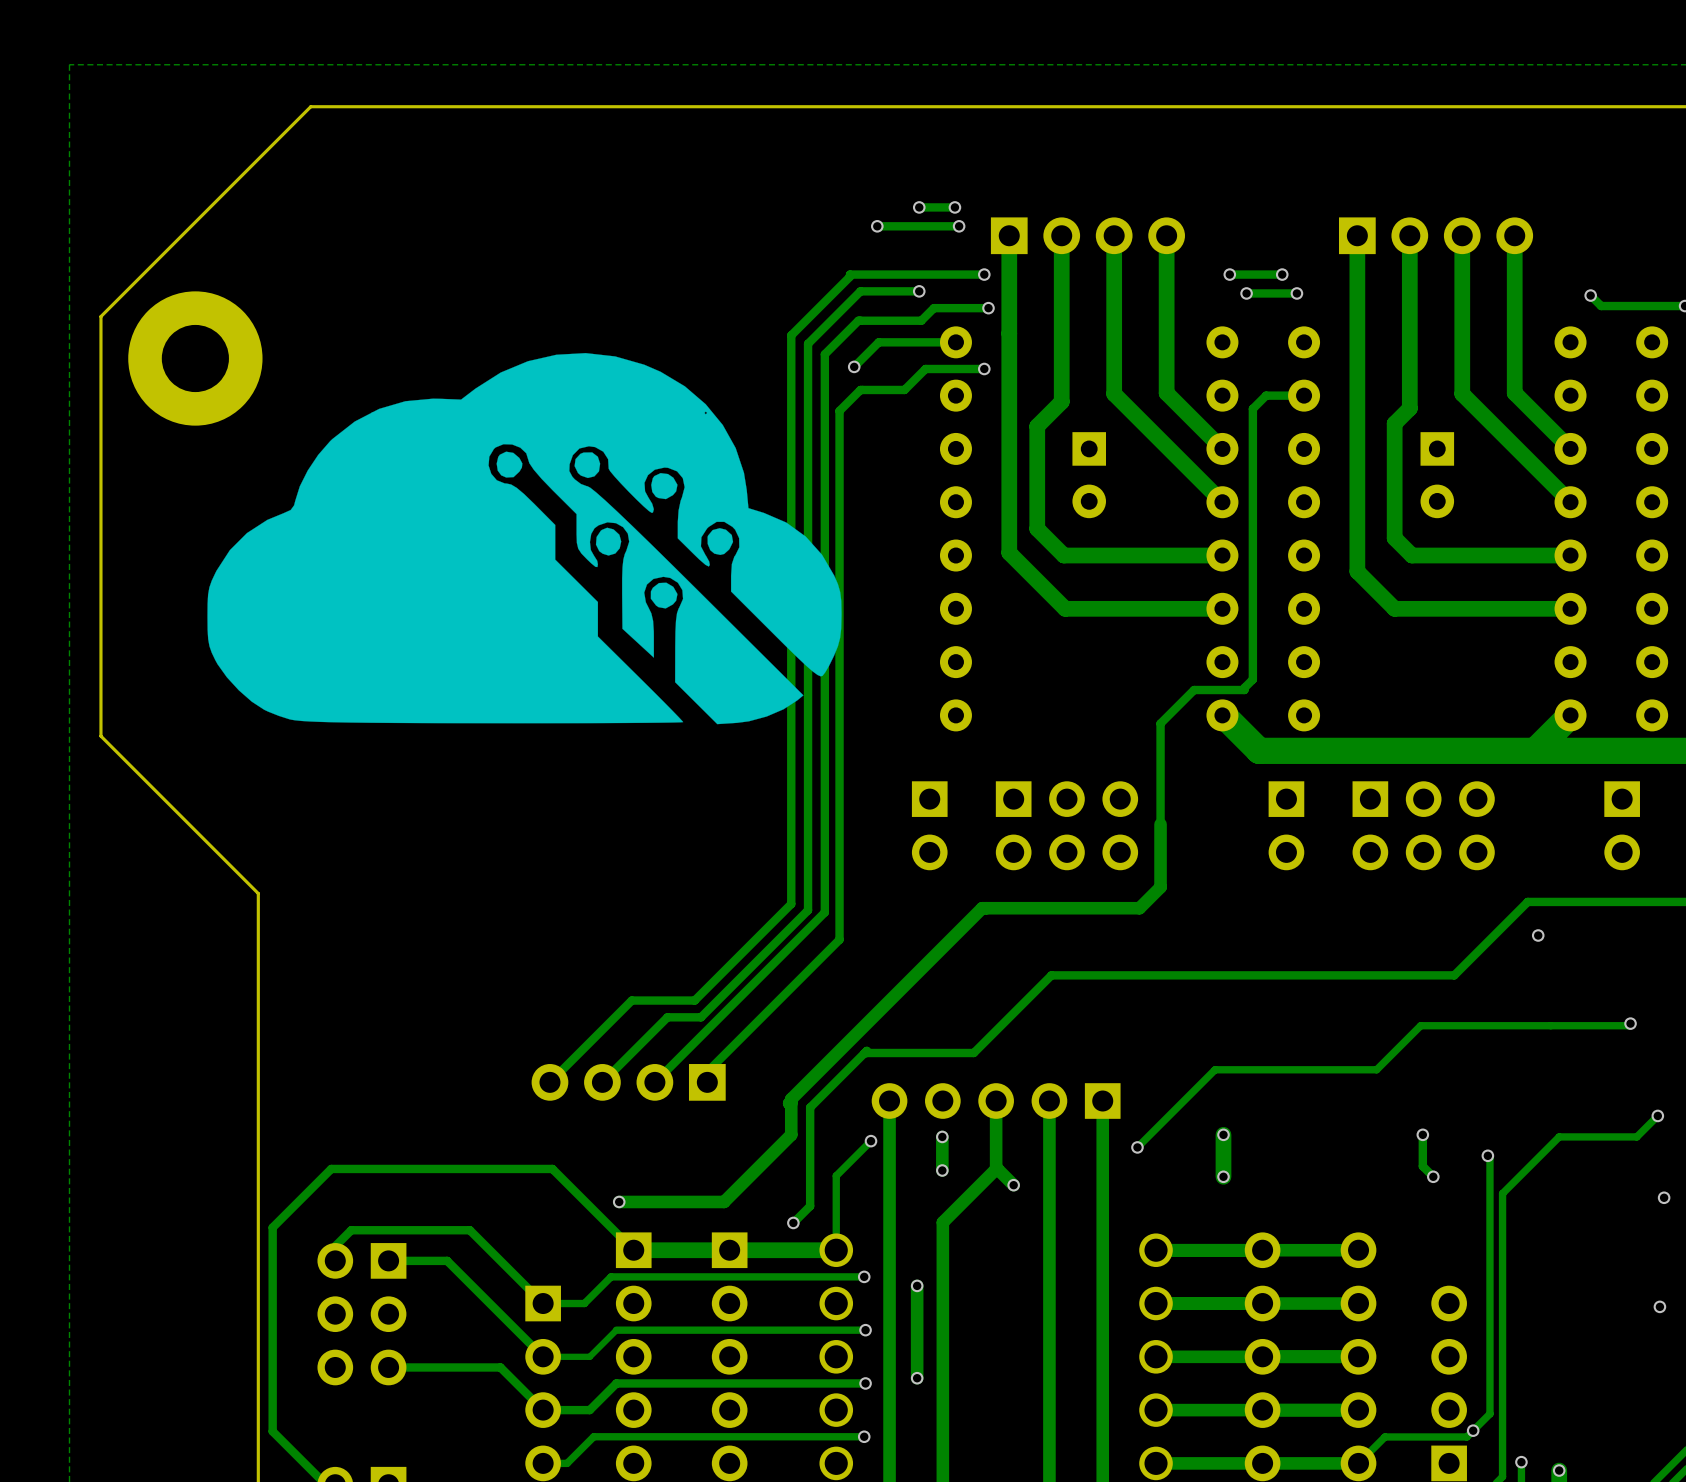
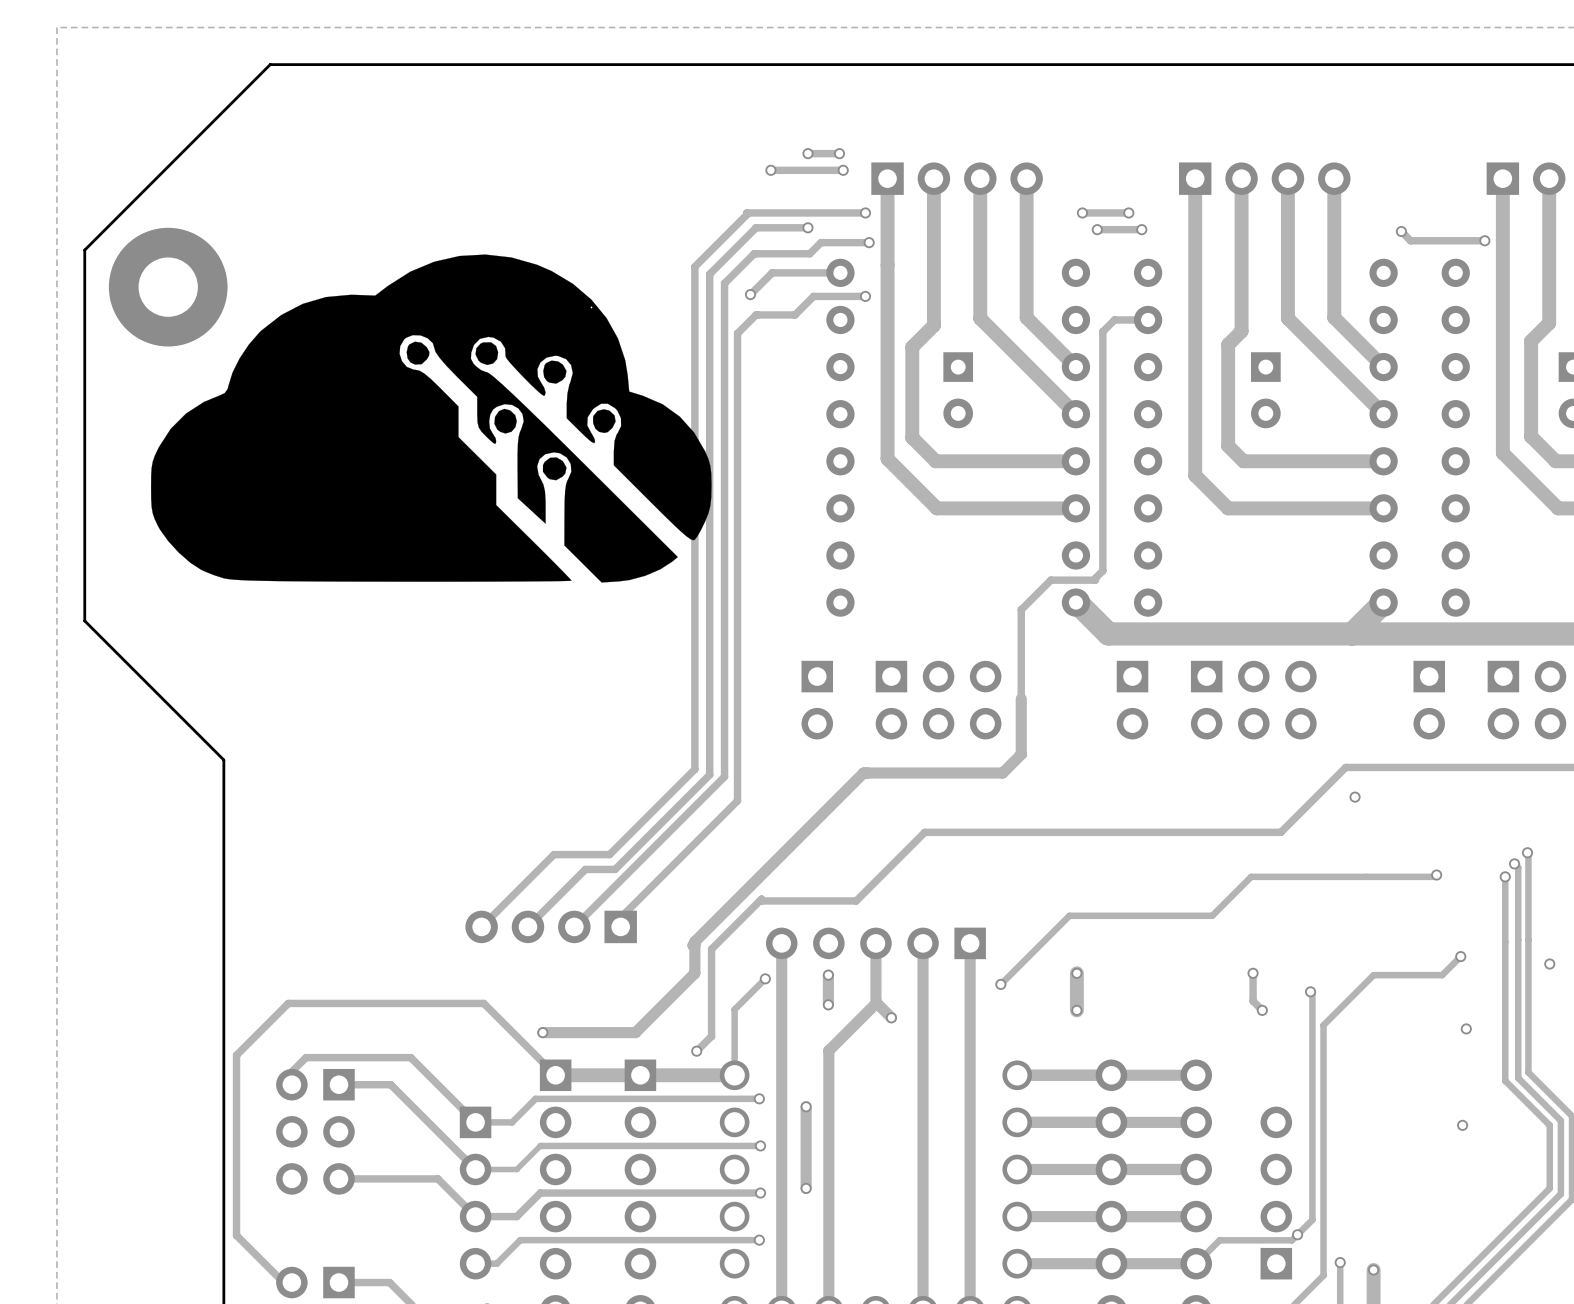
drawing position: (524, 538) -> (431, 418)

